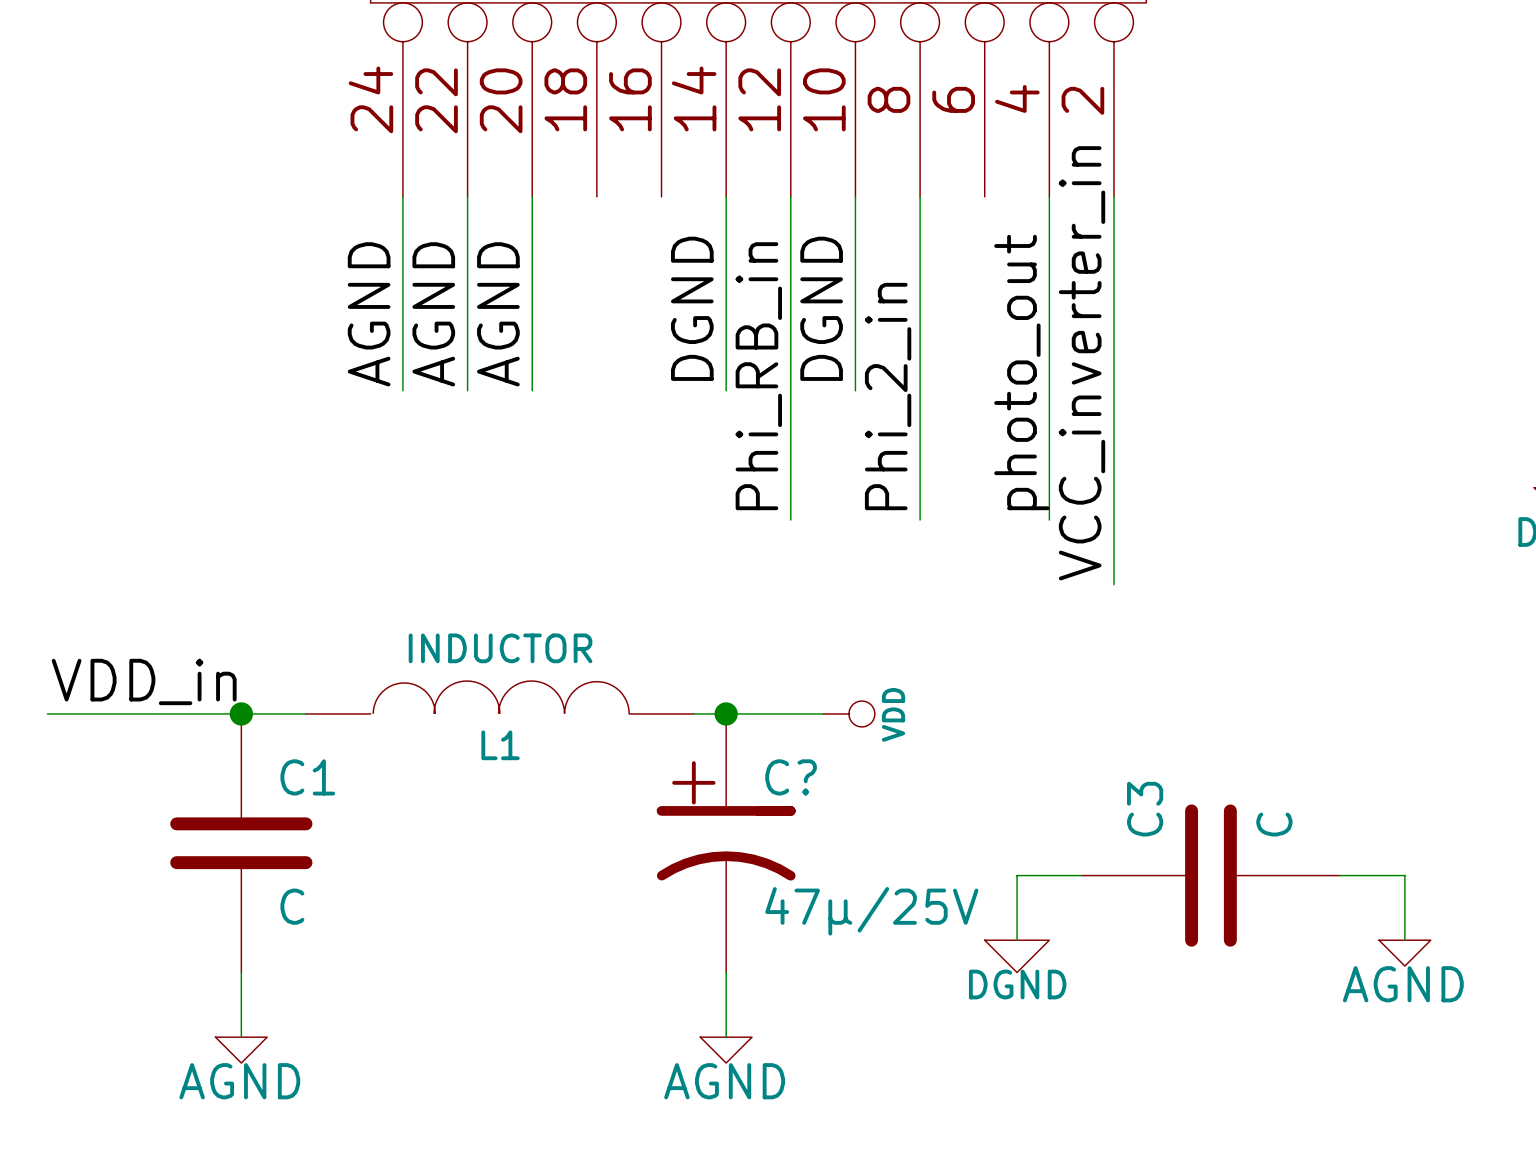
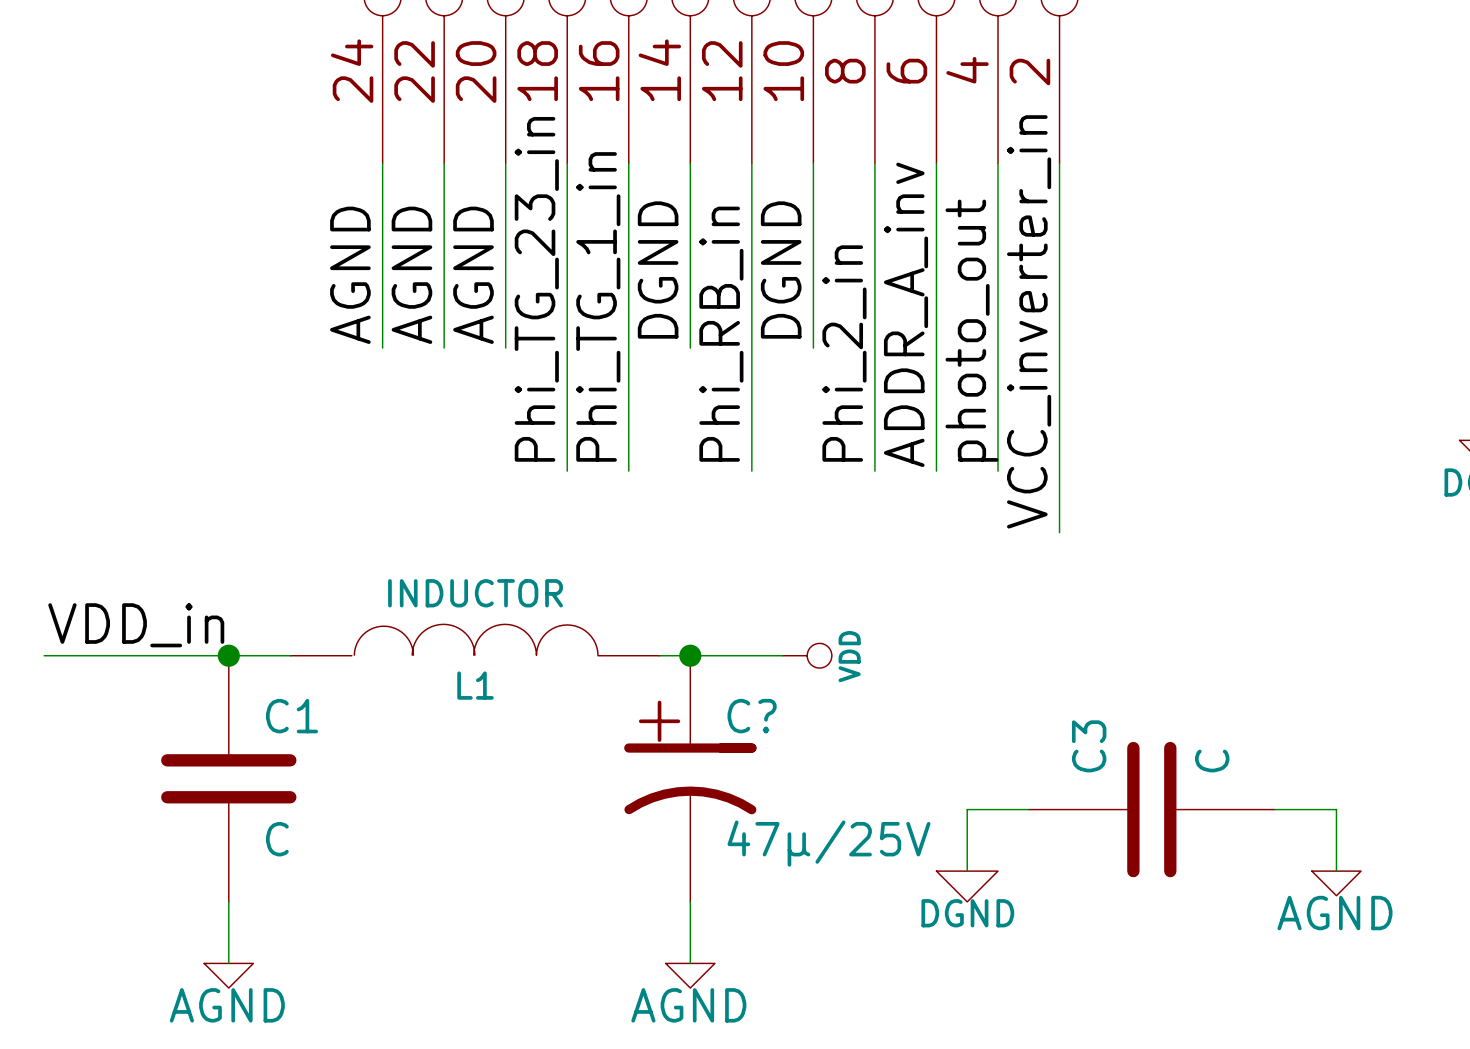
wire: none -> (567, 163) (567, 471)
wire: none -> (628, 163) (628, 471)
wire: none -> (936, 163) (936, 471)
label: none -> Phi_TG_23_in (536, 289)
label: none -> Phi_TG_1_in (598, 306)
label: none -> ADDR_A_inv (906, 314)

